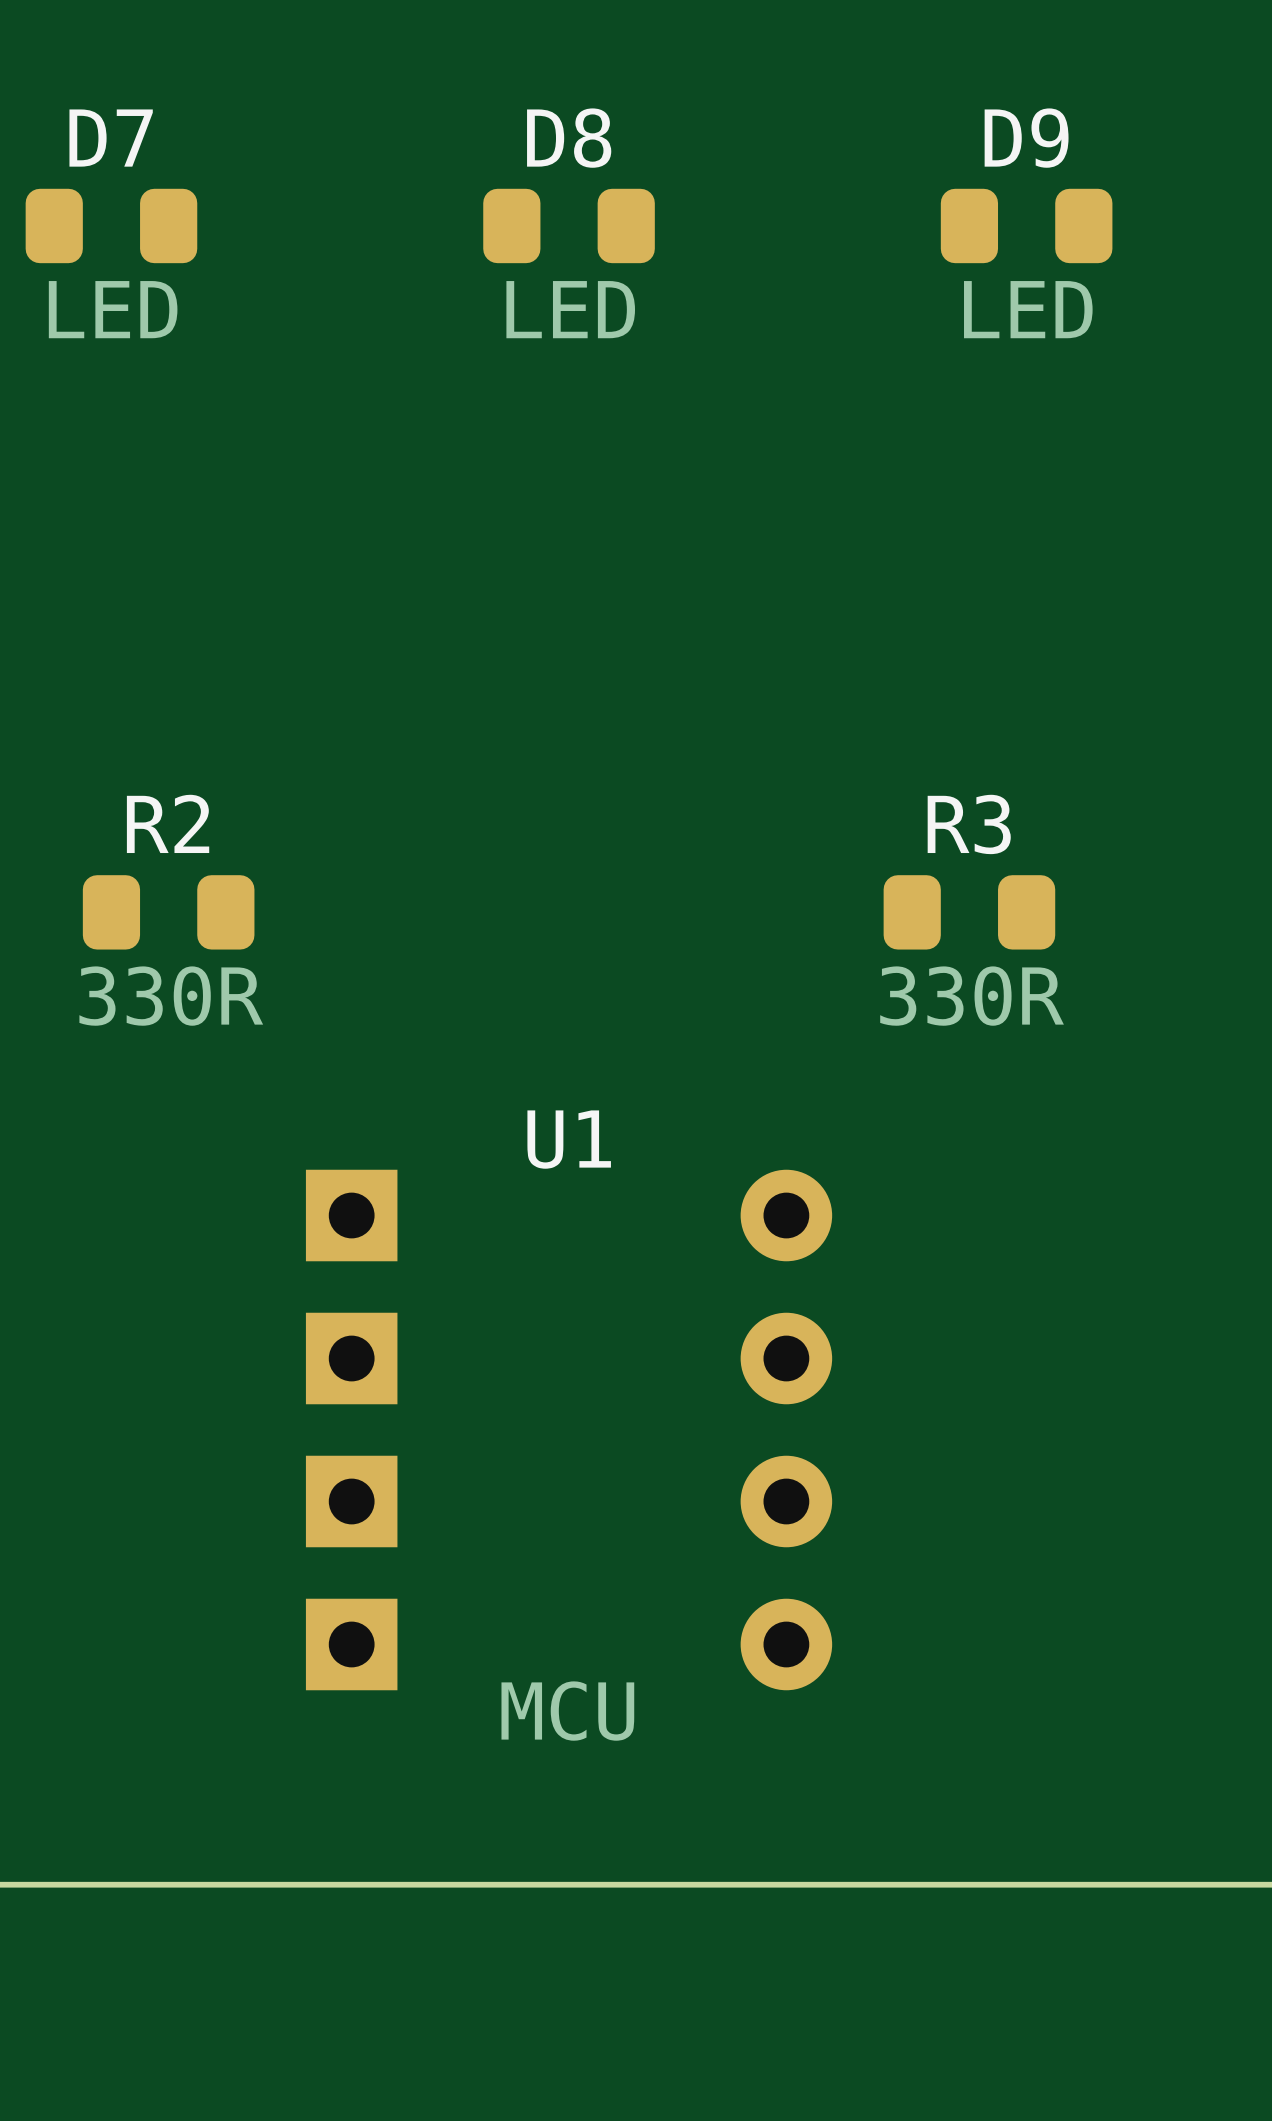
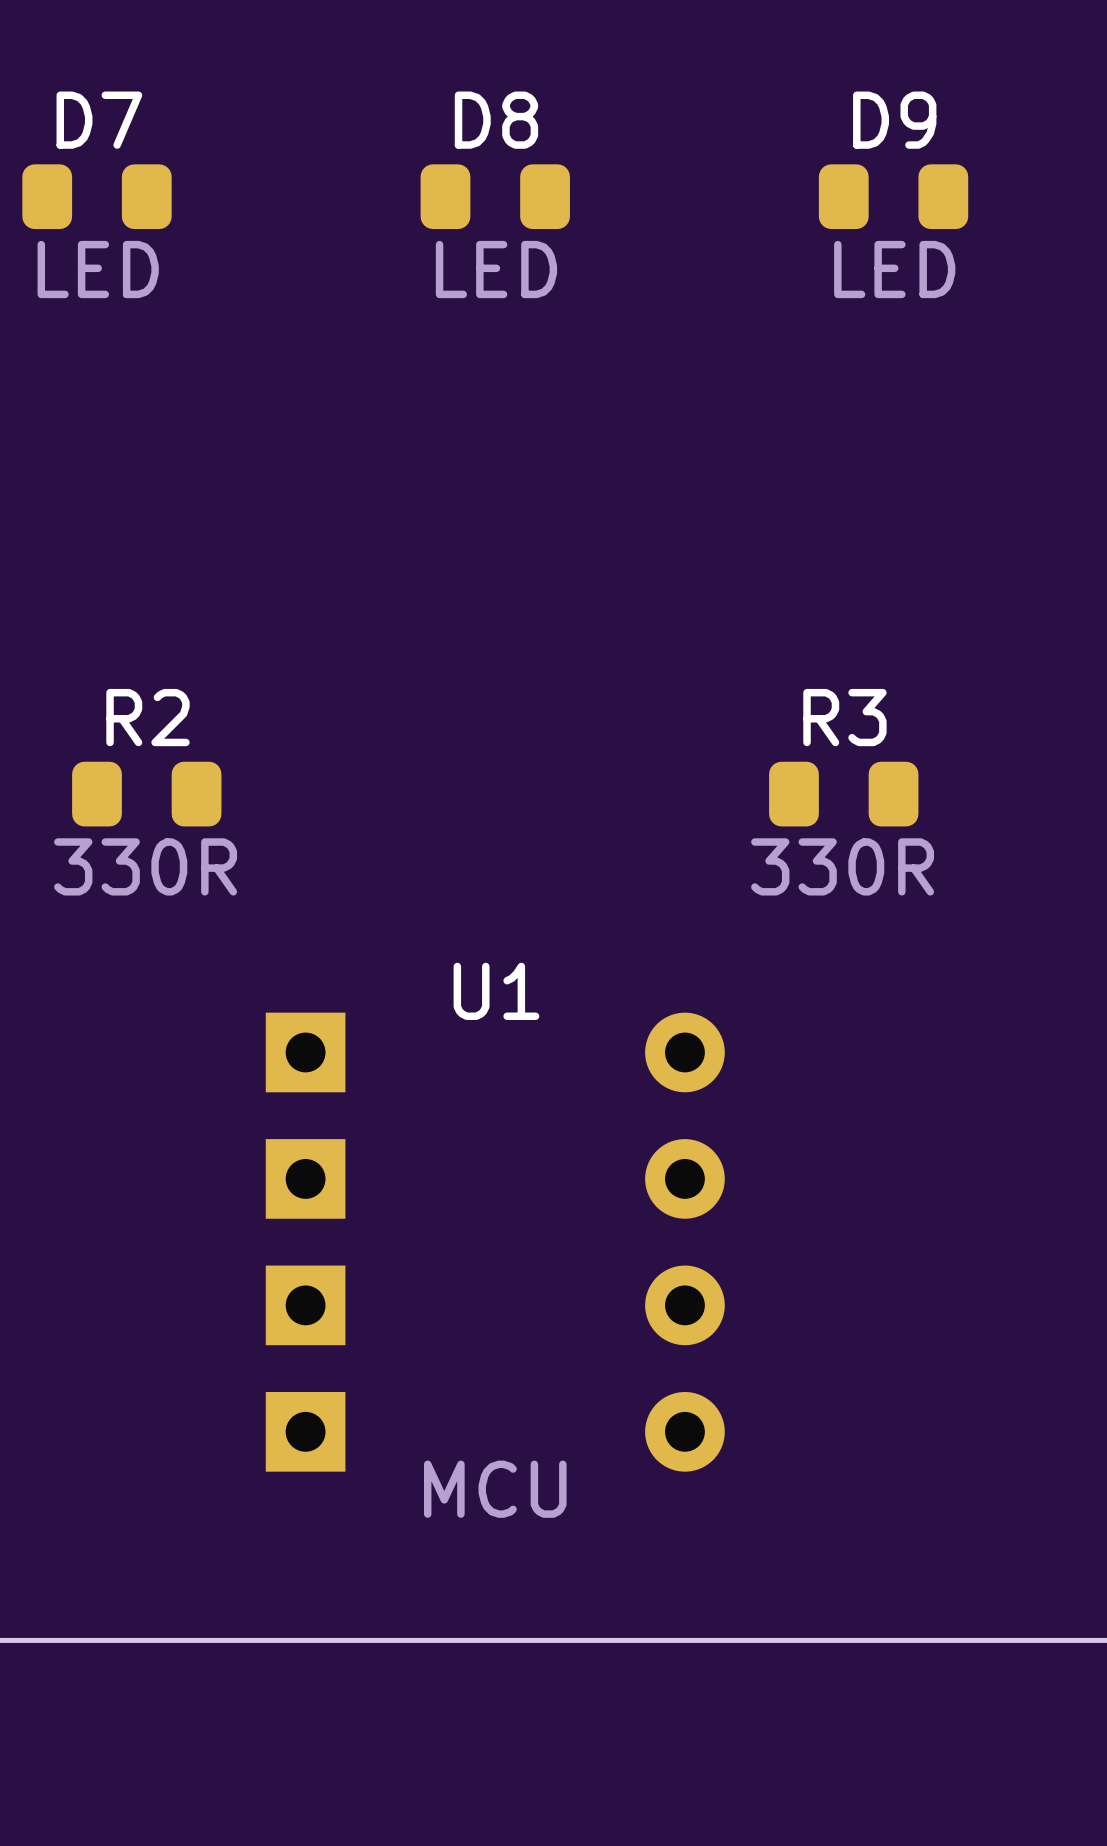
U1 footprint: [305, 1169, 833, 1691] -> [265, 1012, 725, 1472]

